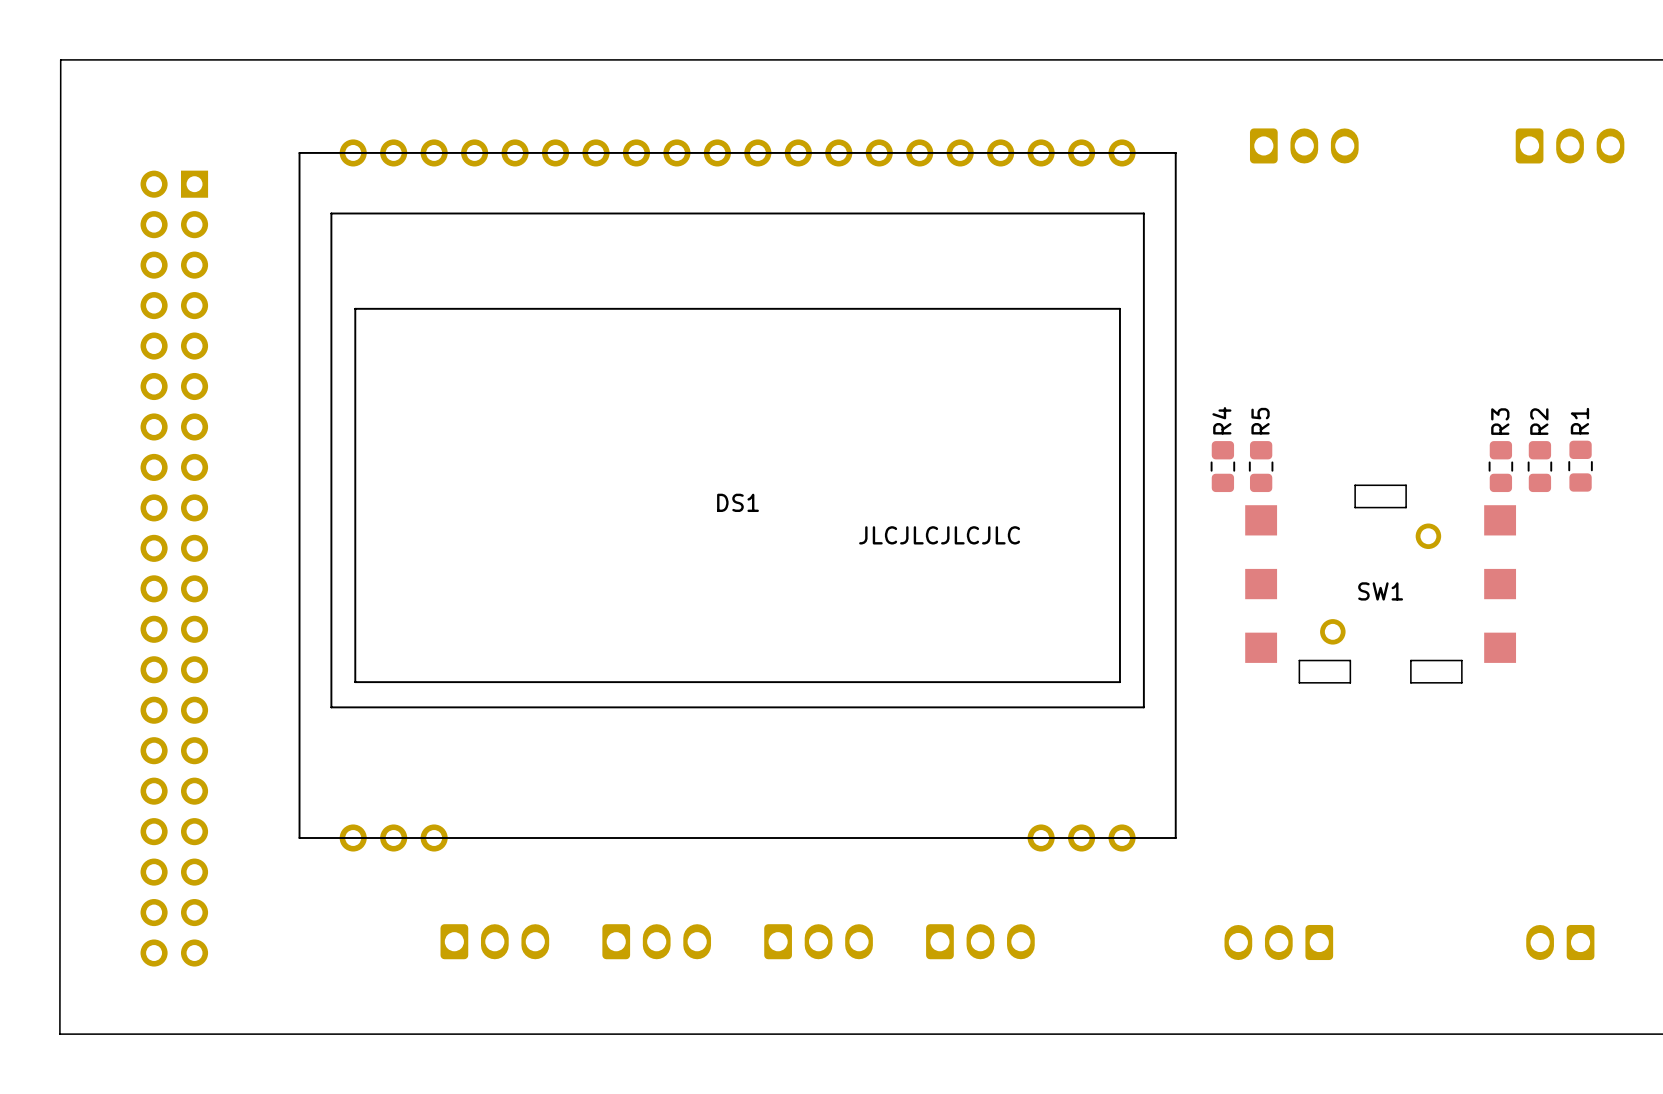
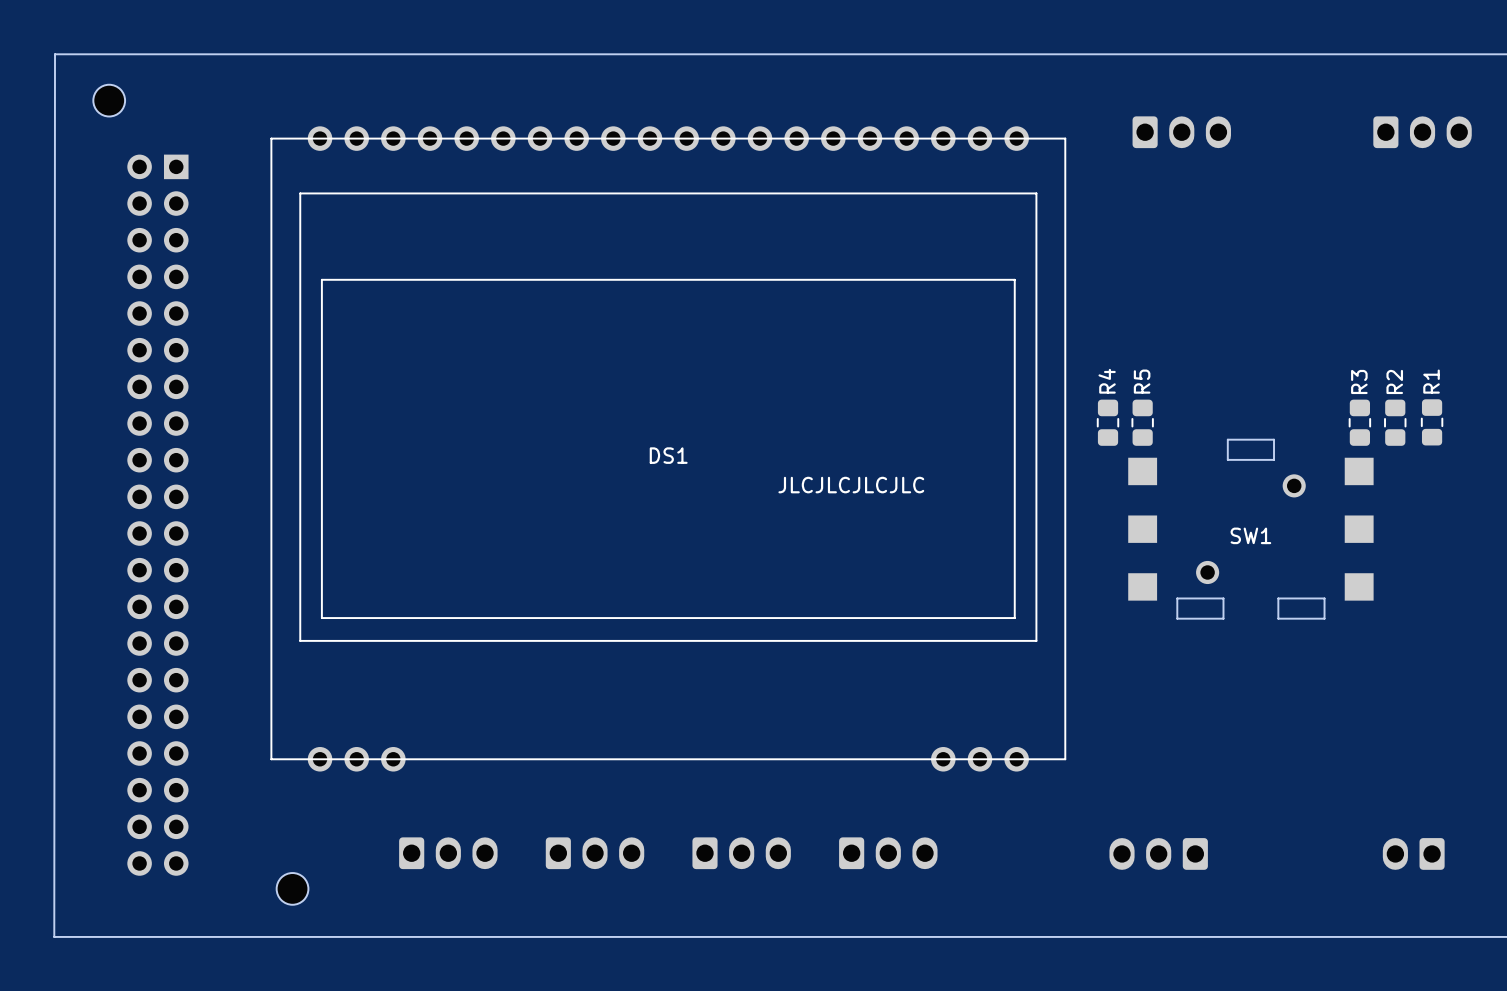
part: none -> (109, 100)
part: none -> (292, 888)

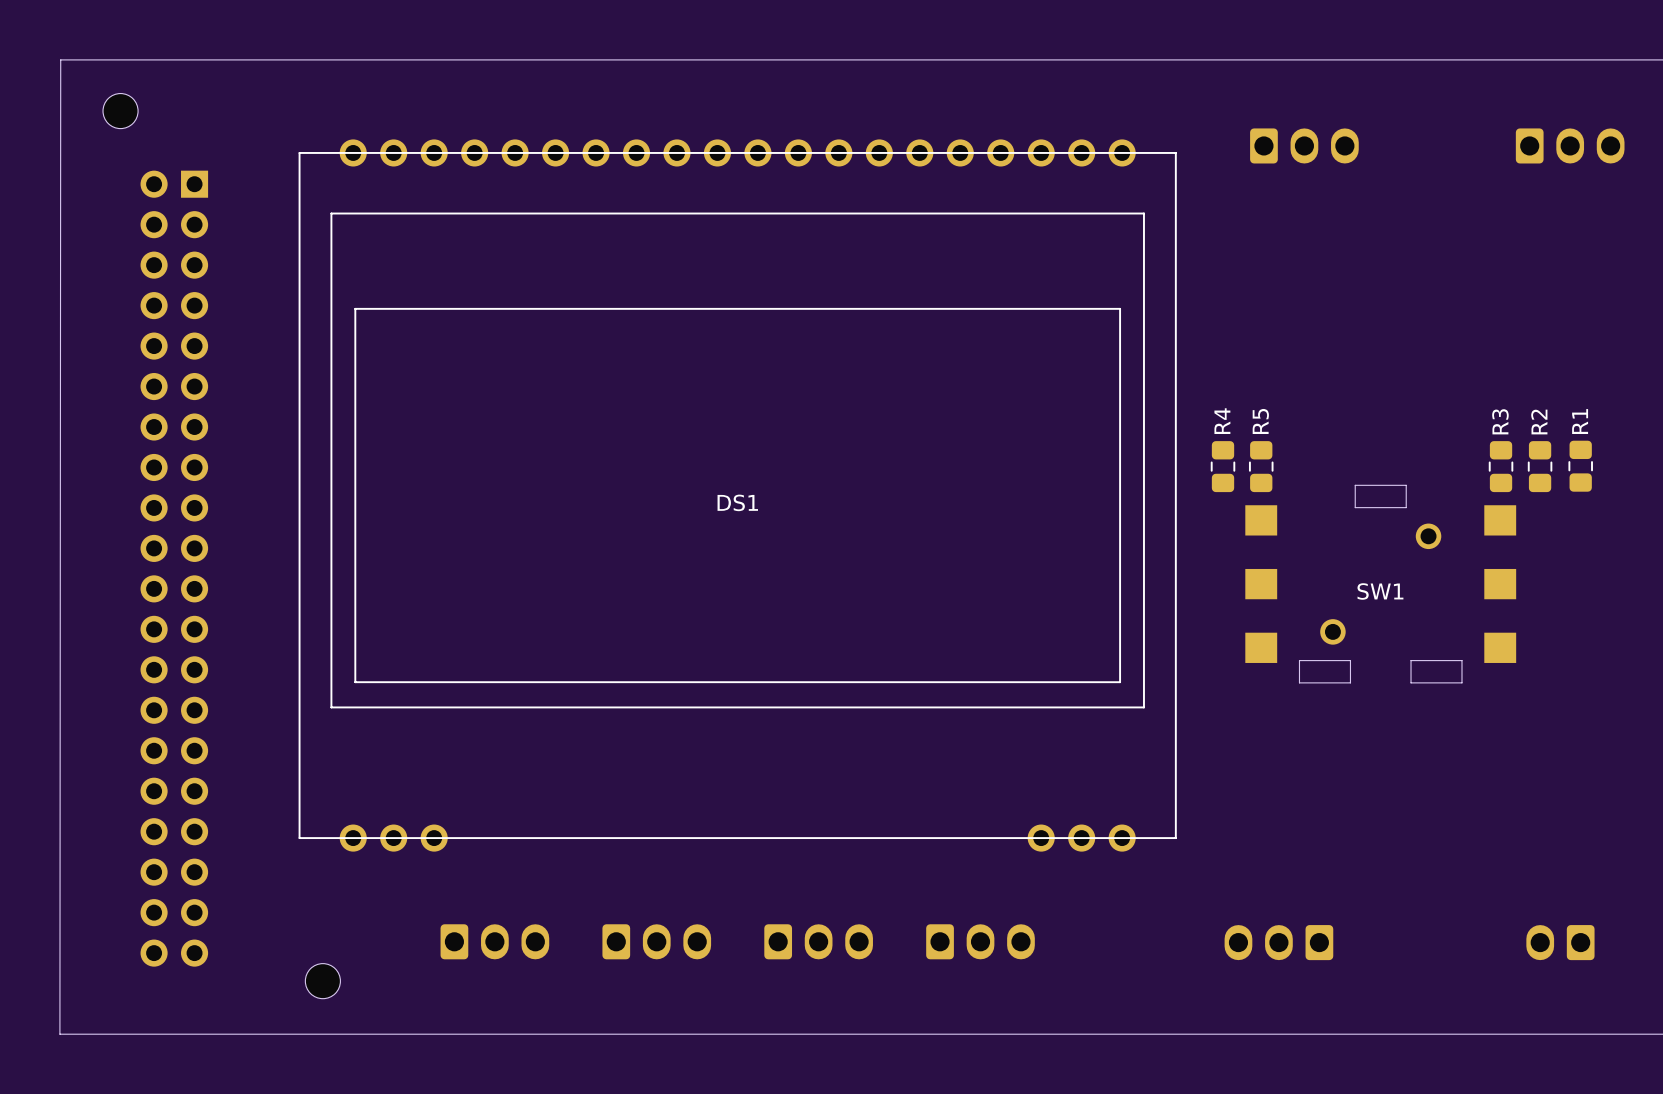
text: JLCJLCJLCJLC (851, 485) -> none

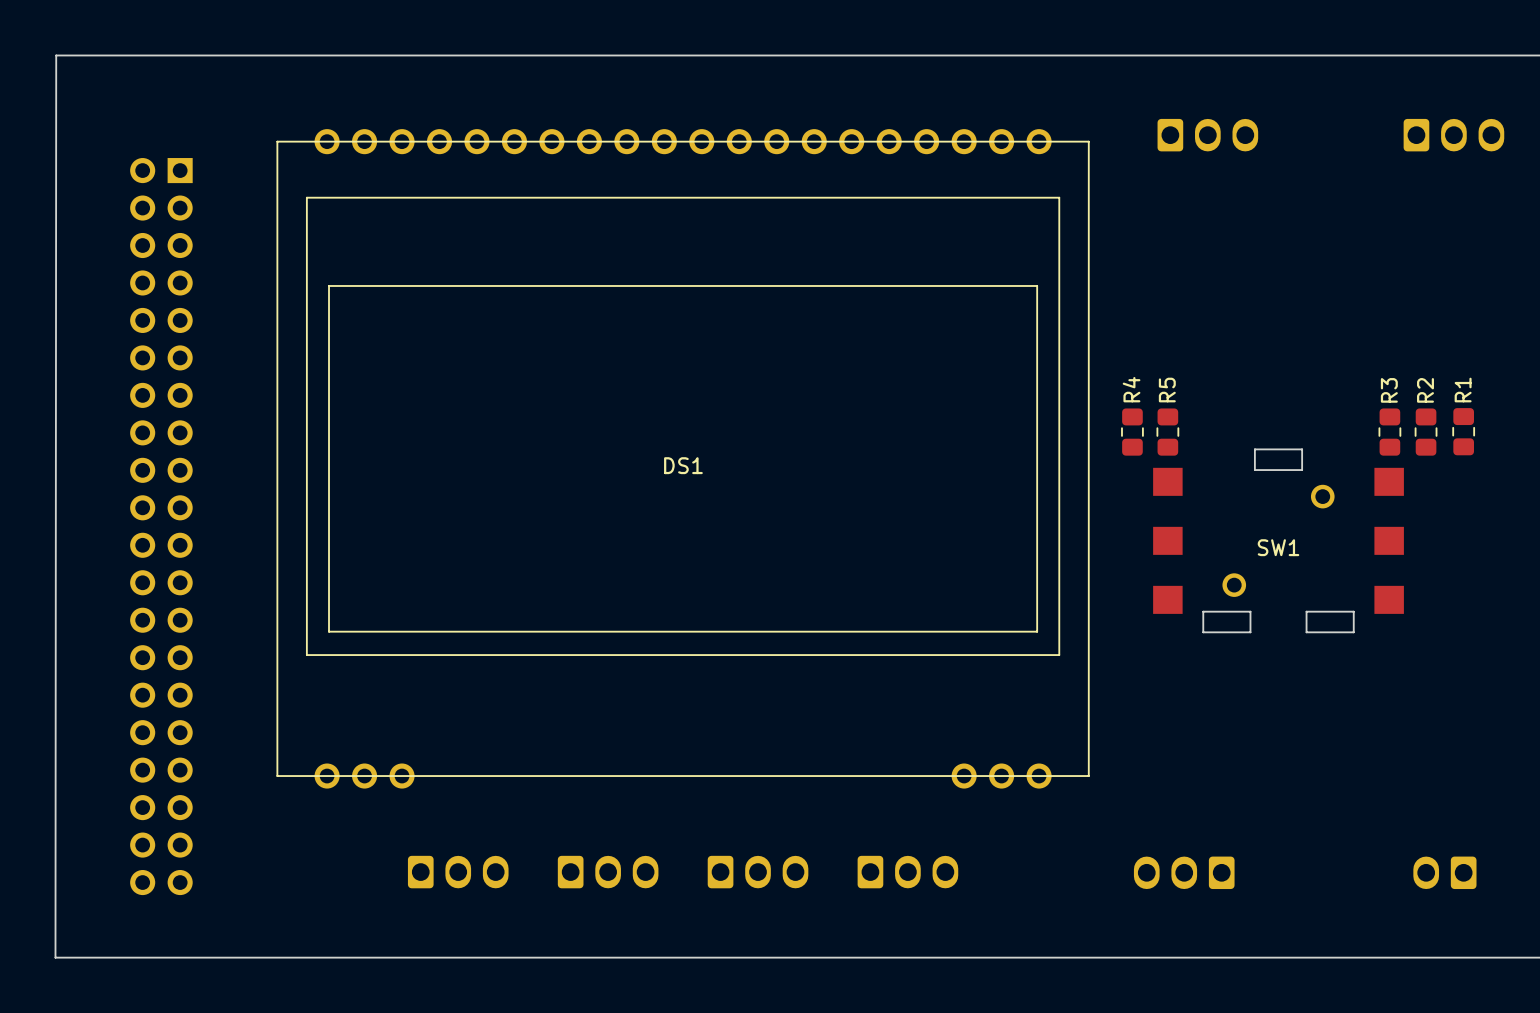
part: (120, 111) -> none
part: (322, 981) -> none

